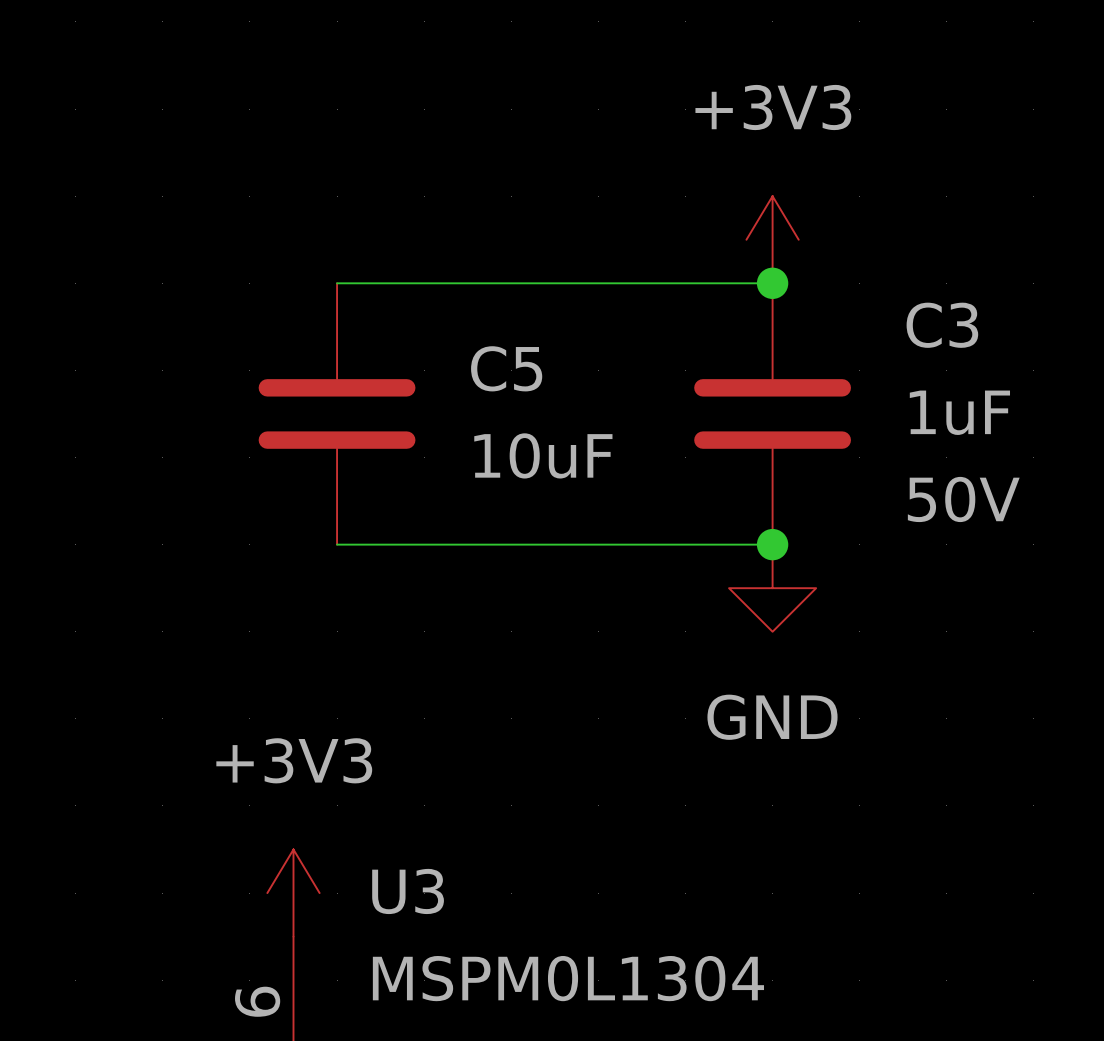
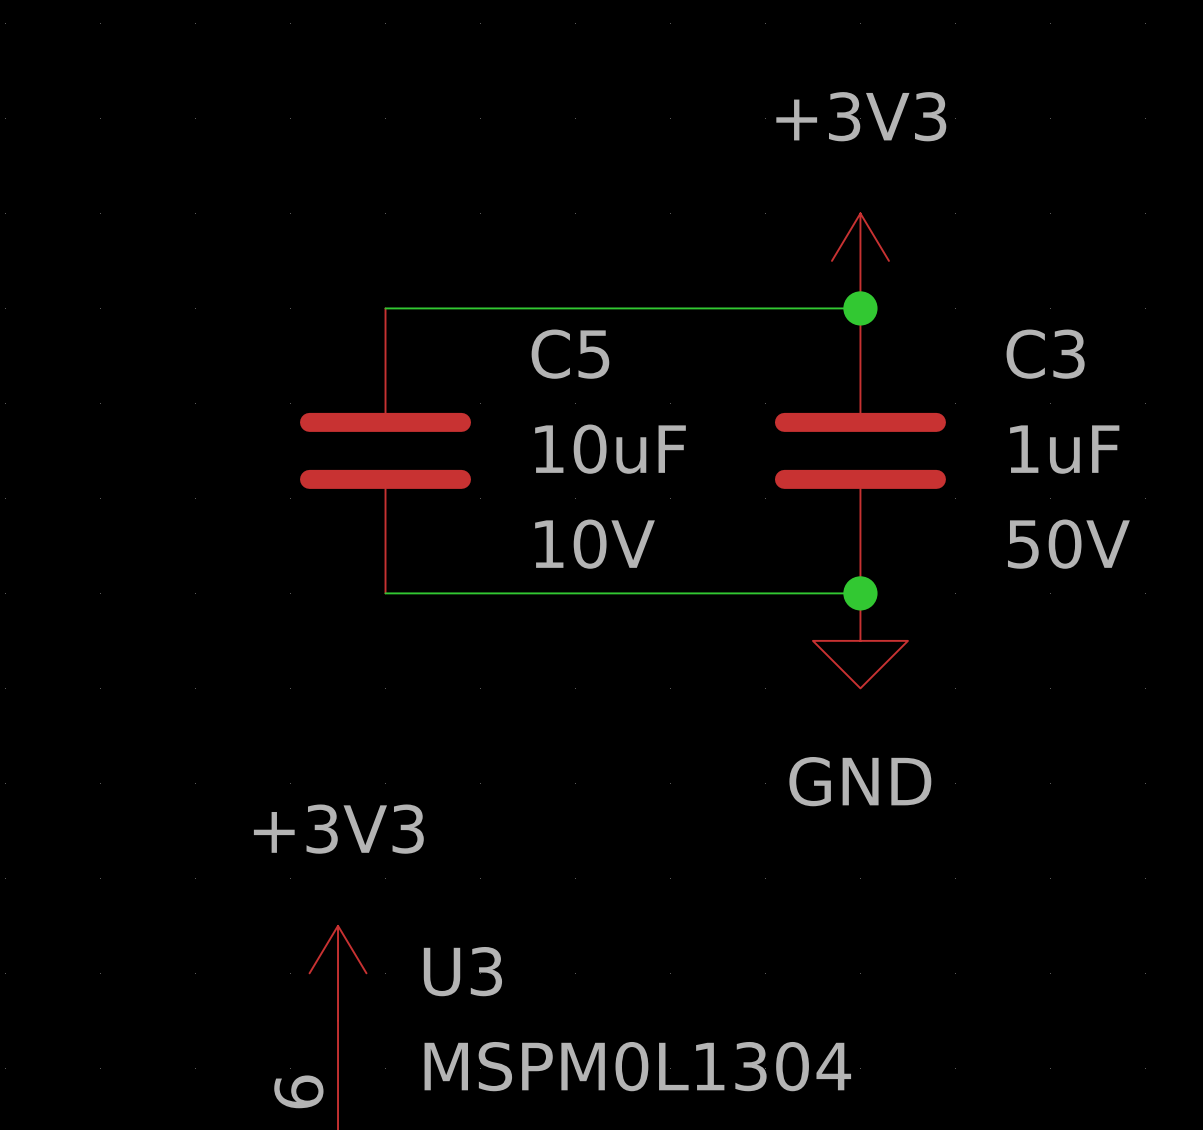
C5 name position: C5 (506, 368) -> C5 (570, 354)
C5 value position: 10uF (543, 455) -> 10uF (610, 449)
C5 text: none -> 10V (595, 544)

